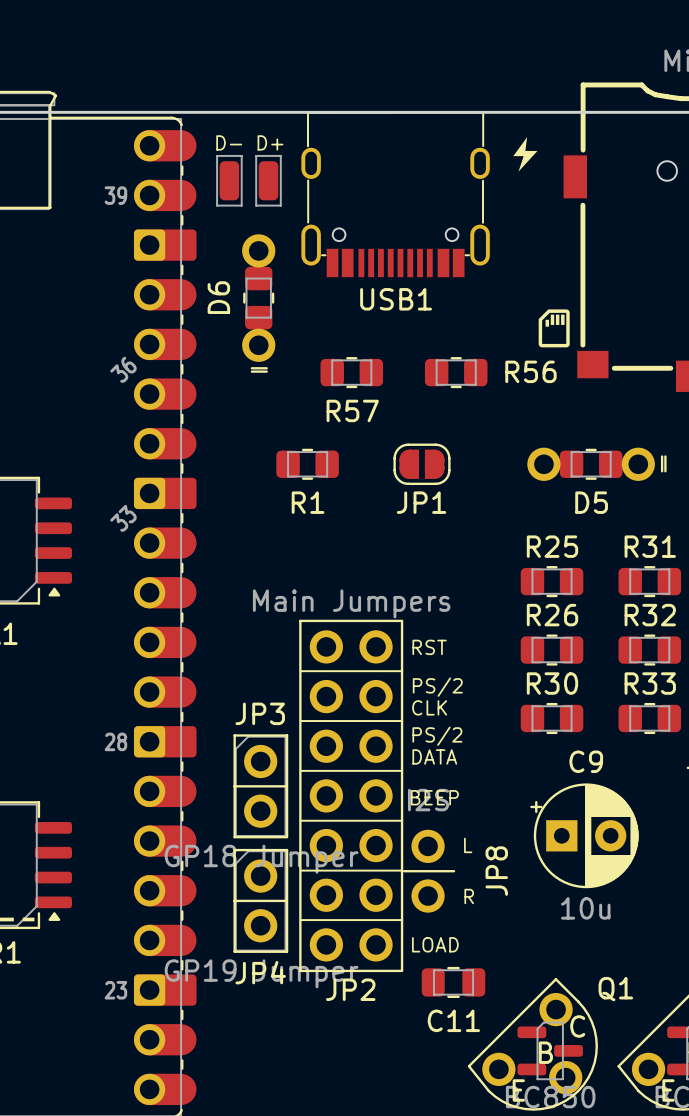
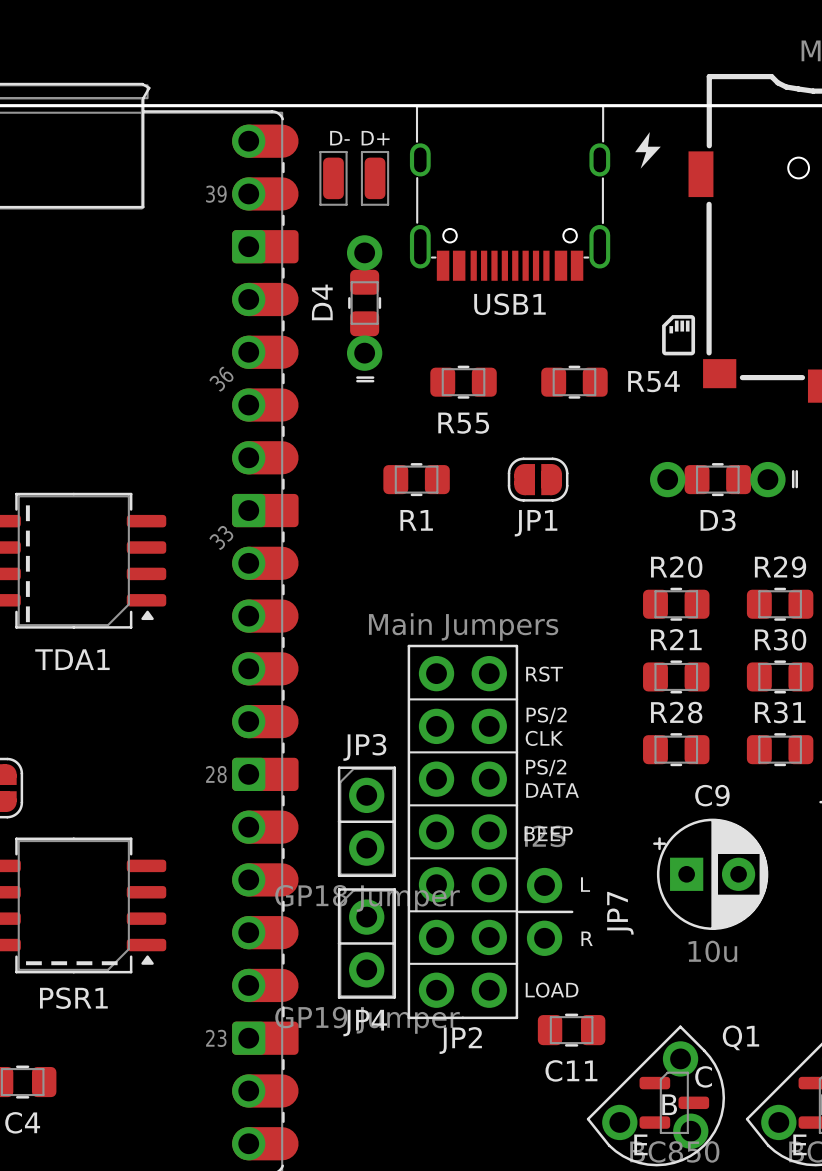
D6 name: D6 (218, 297) -> D4 (322, 302)
R56 name: R56 (530, 371) -> R54 (654, 381)
R57 name: R57 (352, 410) -> R55 (463, 423)
D5 name: D5 (591, 502) -> D3 (718, 520)
R25 name: R25 (552, 546) -> R20 (676, 567)
R31 name: R31 (650, 546) -> R29 (780, 567)
R26 name: R26 (552, 615) -> R21 (676, 639)
R32 name: R32 (650, 615) -> R30 (780, 639)
R30 name: R30 (552, 683) -> R28 (676, 712)
R33 name: R33 (650, 683) -> R31 (780, 712)
JP8 name: JP8 (496, 871) -> JP7 (620, 913)

